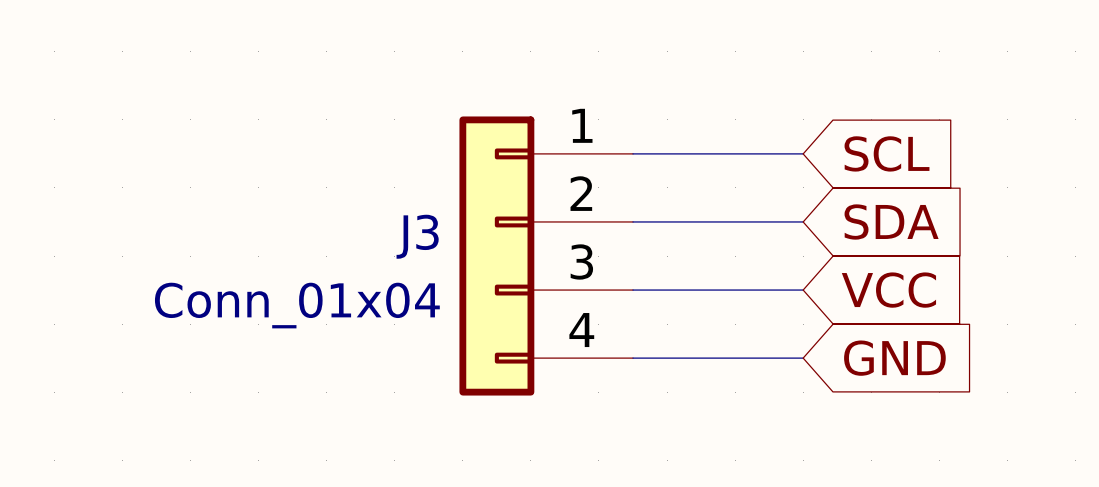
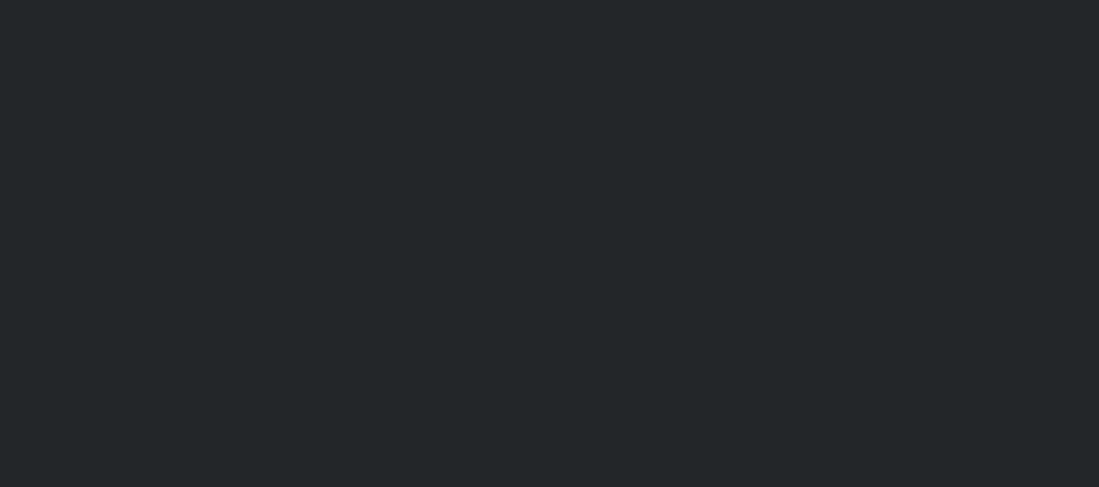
wire: (633, 153) (803, 153) -> none
global label: SCL (886, 153) -> none
wire: (633, 221) (803, 221) -> none
global label: SDA (891, 222) -> none
J3: Conn_01x04 (546, 256) -> none
wire: (633, 290) (803, 290) -> none
global label: VCC (888, 290) -> none
wire: (633, 358) (803, 358) -> none
global label: GND (894, 358) -> none

